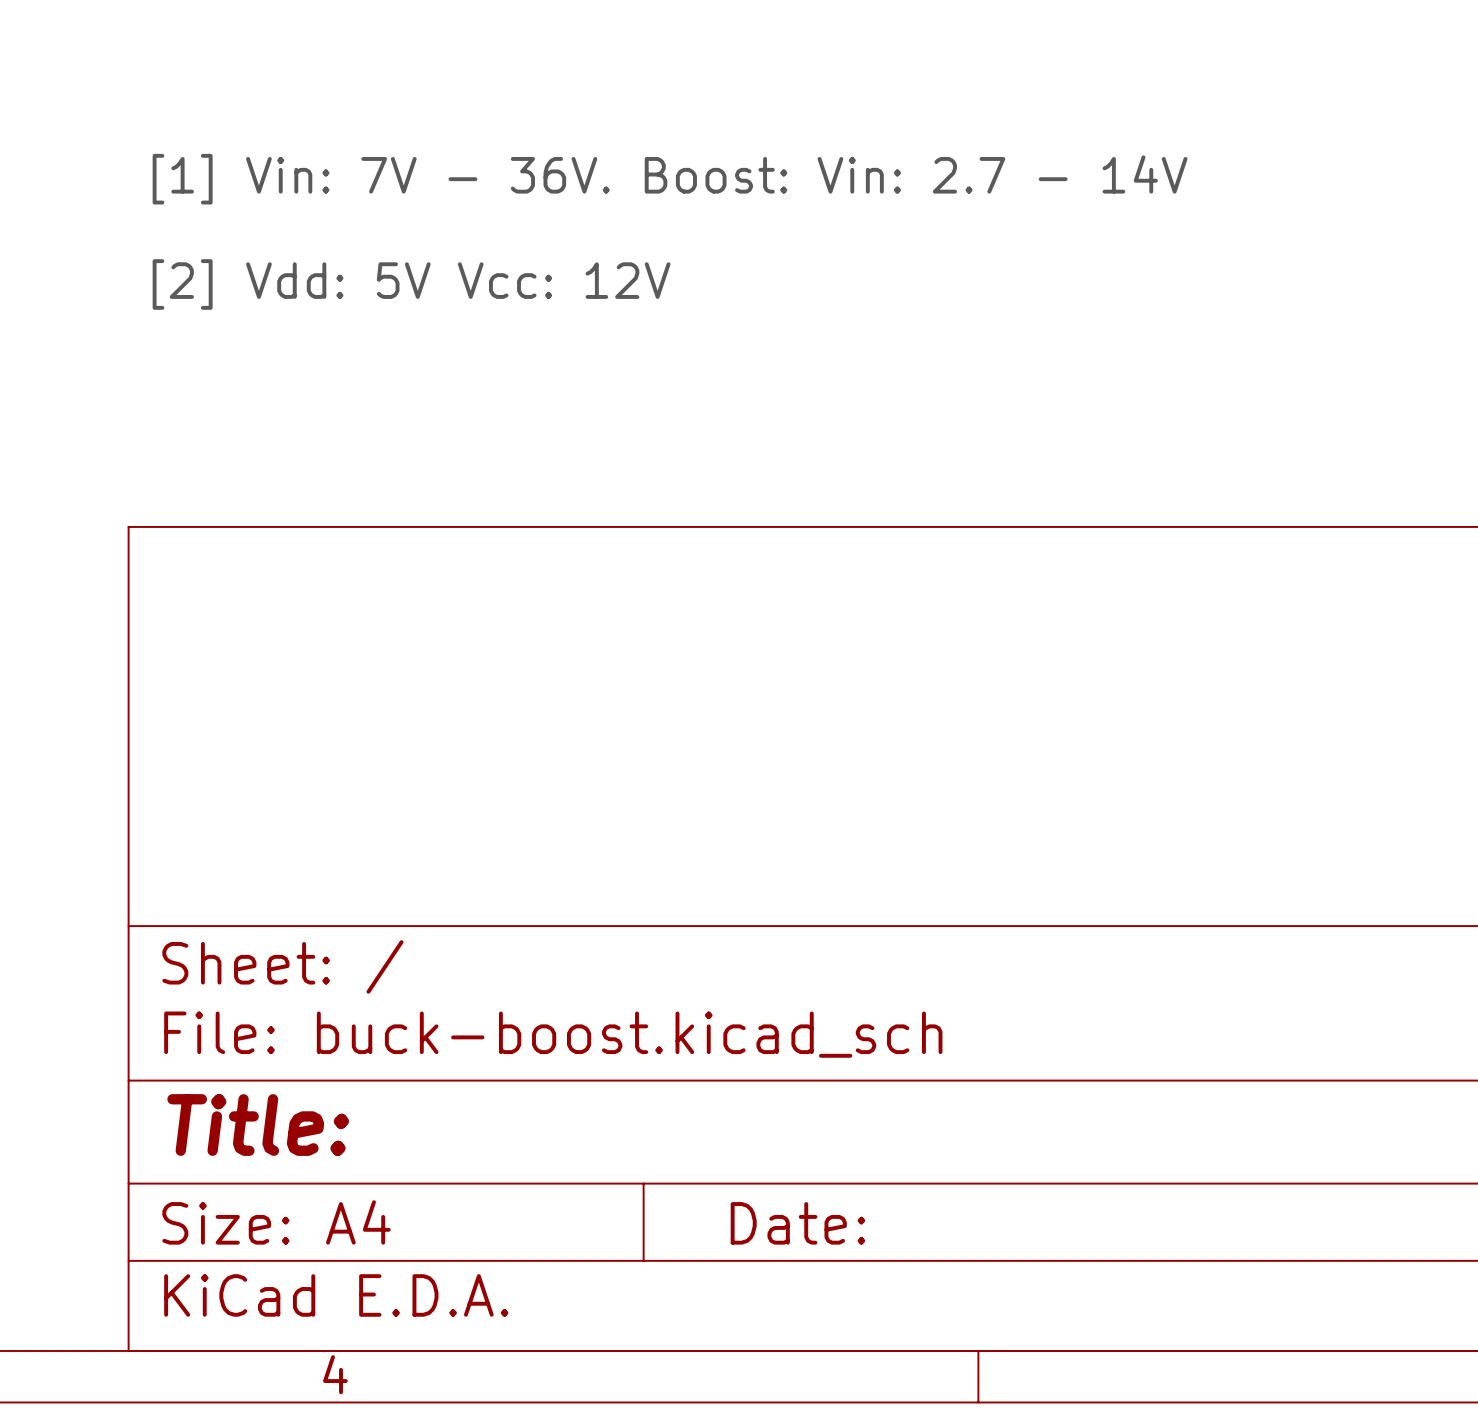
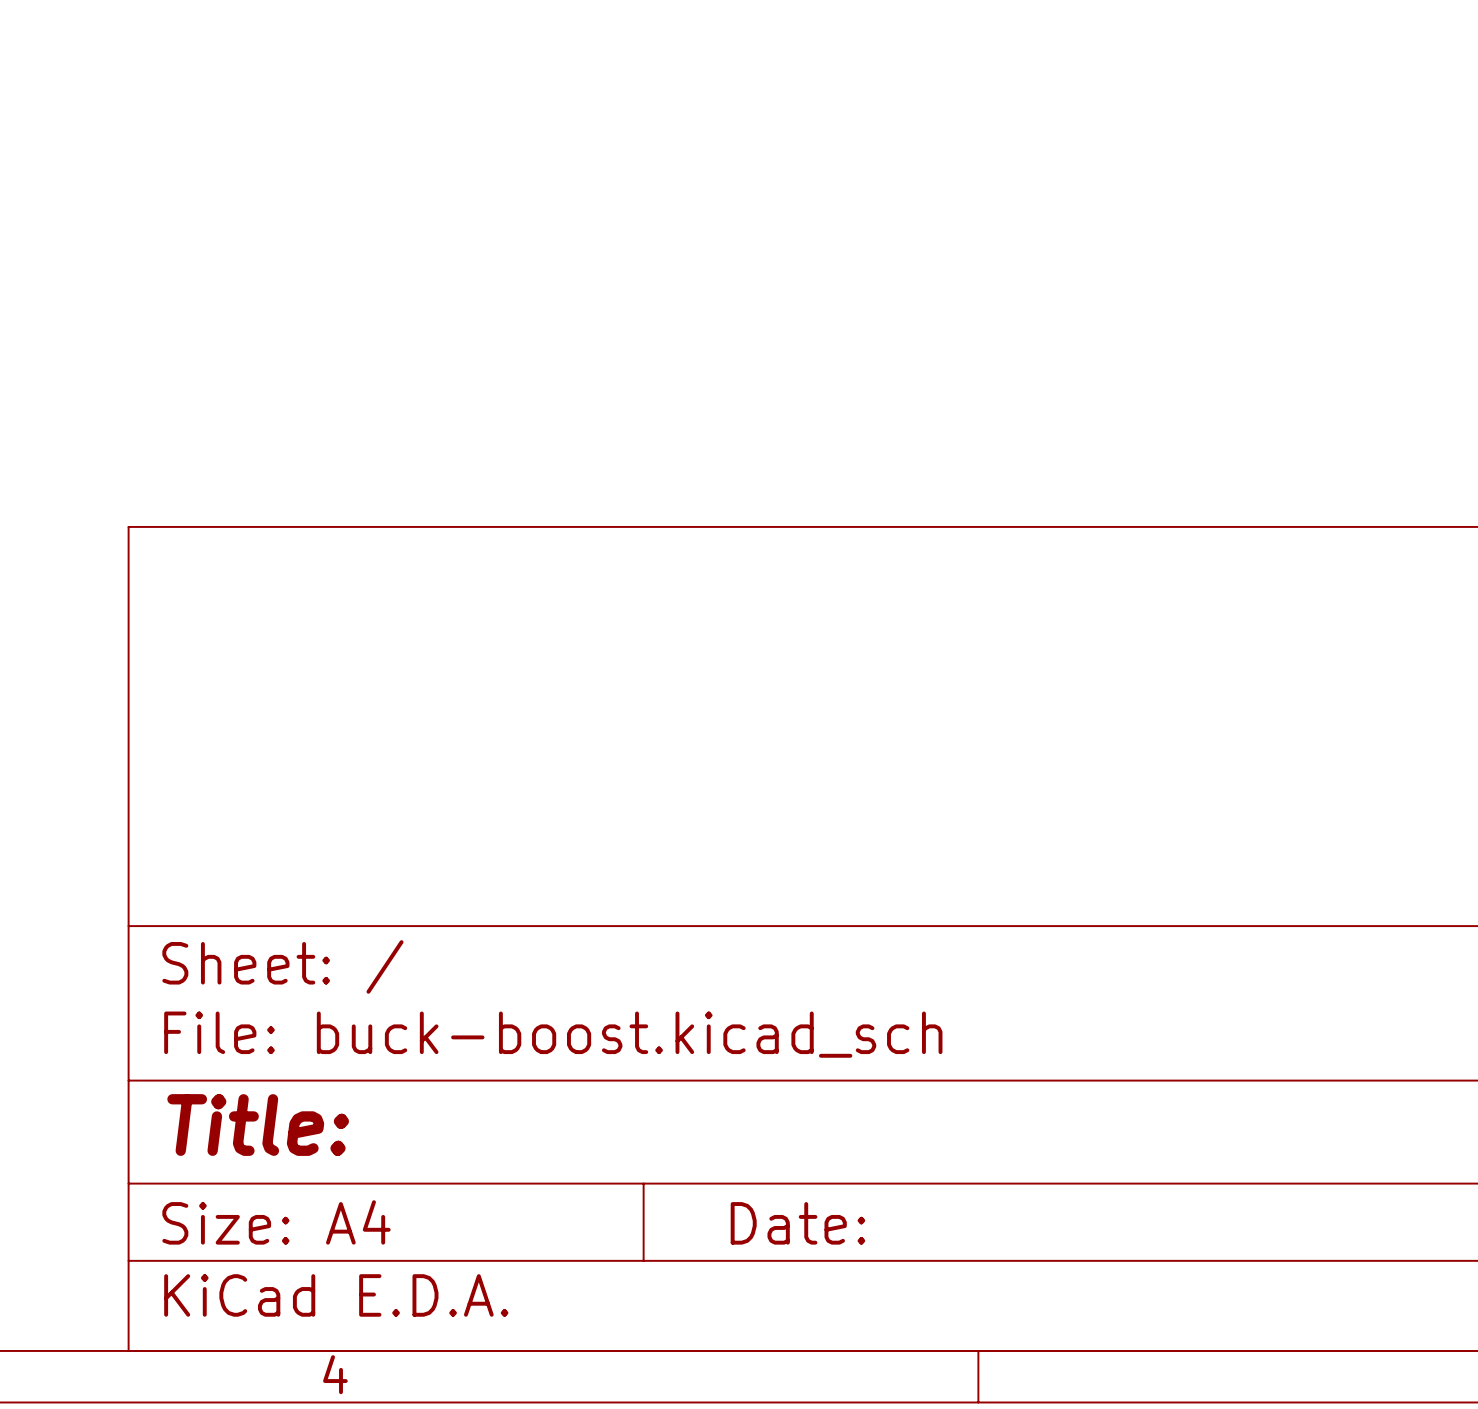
text: [1] Vin: 7V - 36V. Boost: Vin: 2.7 - 14V (670, 179) -> none
text: [2] Vdd: 5V Vcc: 12V (411, 284) -> none

